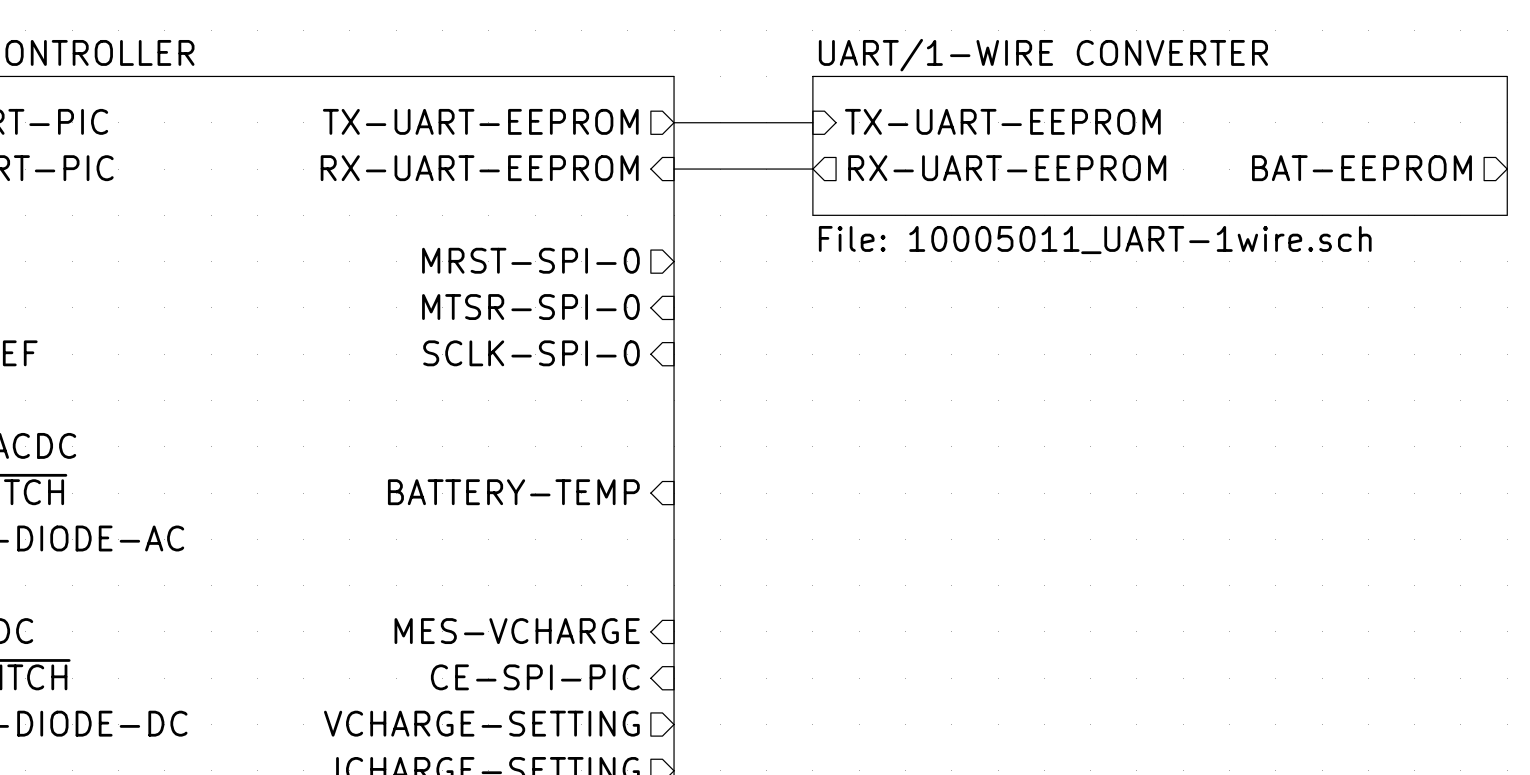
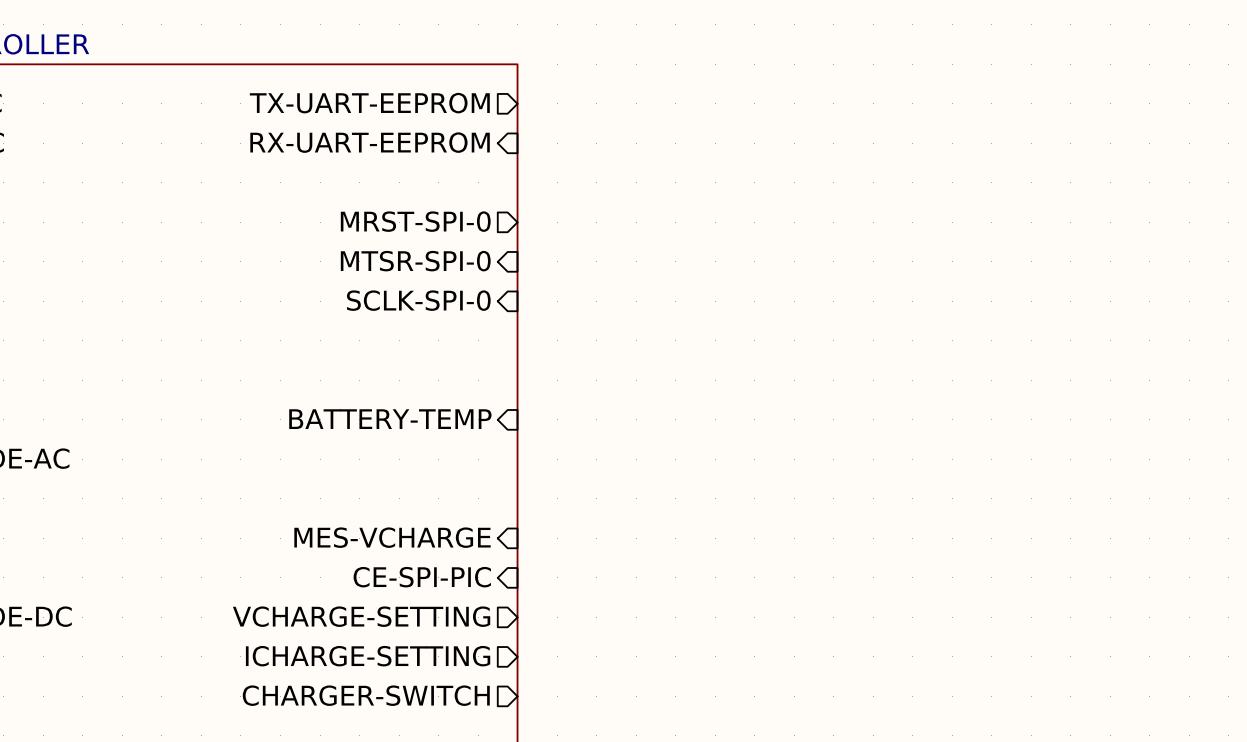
sheet pin: TX-UART-EEPROM (1002, 121) -> none
wire: (674, 122) (812, 122) -> none
sheet UART/1-WIRE CONVERTER: File: 10005011_UART-1wire.sch (1160, 145) -> none
sheet pin: RX-UART-EEPROM (1007, 168) -> none
sheet pin: BAT-EEPROM (1361, 168) -> none
wire: (674, 169) (812, 169) -> none

